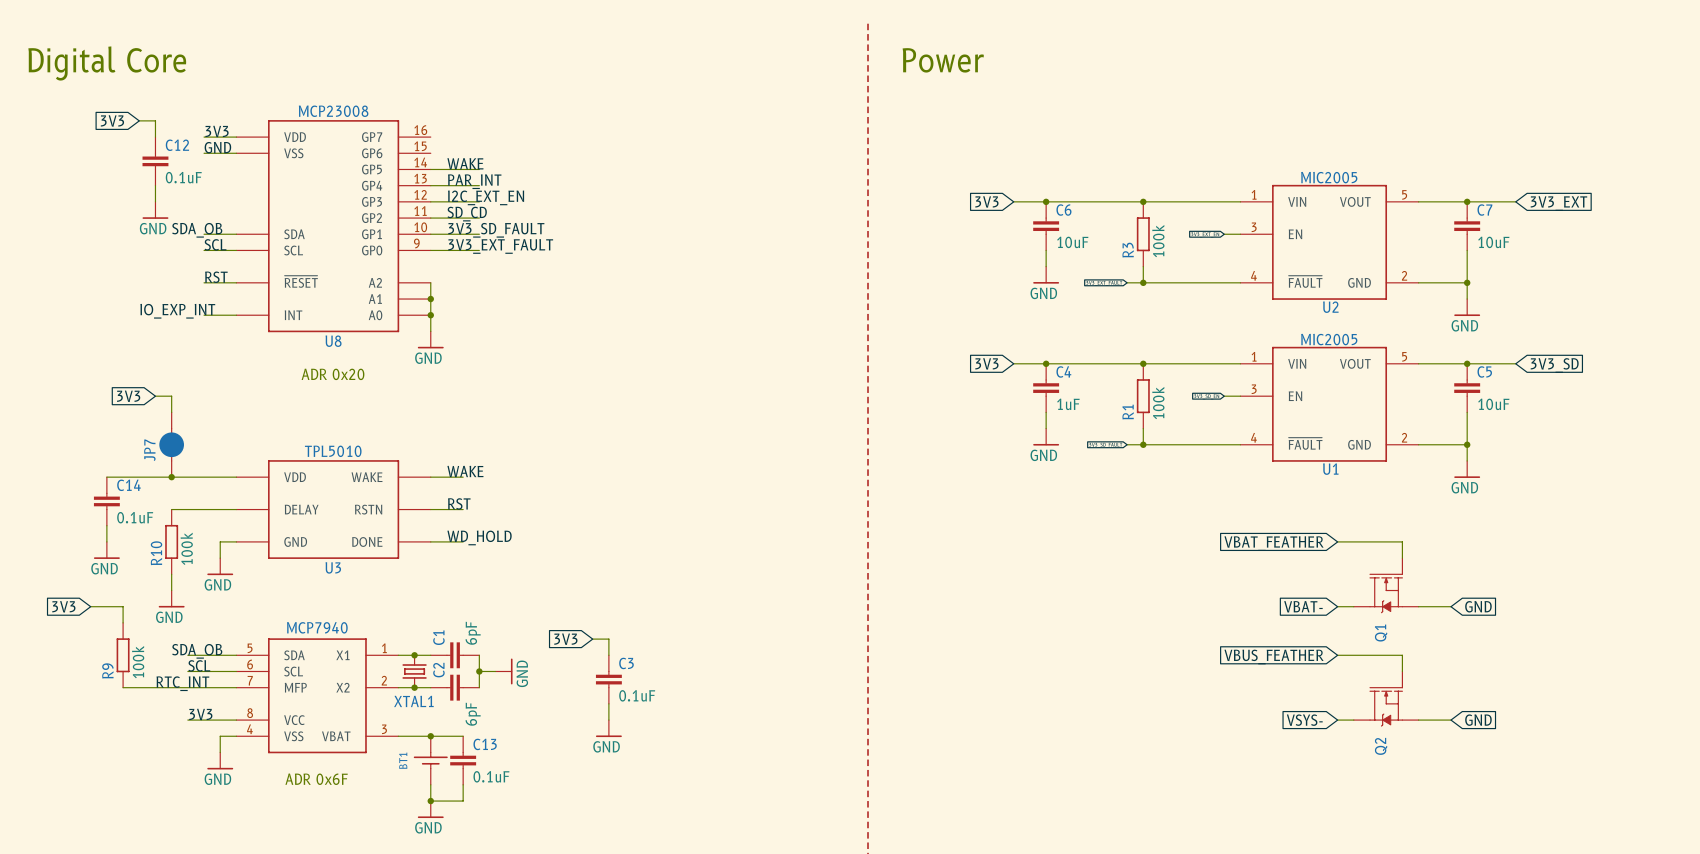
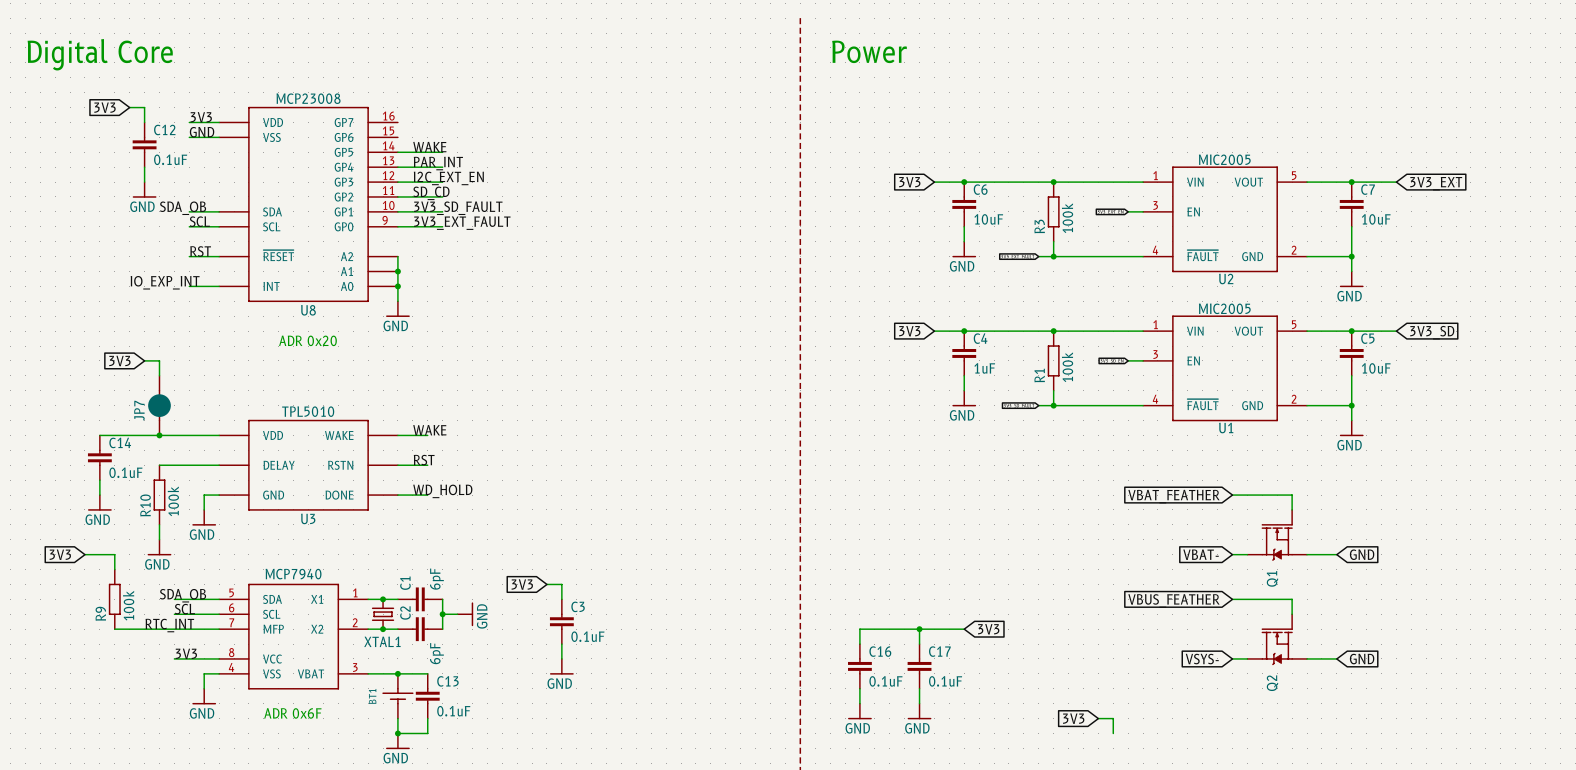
wire: none -> (919, 629) (919, 644)
junction: none -> (919, 629)
wire: none -> (964, 629) (859, 629) (859, 644)
global label: none -> 3V3 (988, 629)
C16: none -> 0.1uF (859, 666)
C17: none -> 0.1uF (919, 666)
wire: none -> (859, 688) (859, 703)
wire: none -> (919, 688) (919, 703)
power symbol: none -> GND (859, 711)
power symbol: none -> GND (919, 711)
global label: none -> 3V3 (1073, 718)
wire: none -> (1098, 718) (1113, 718) (1113, 733)

